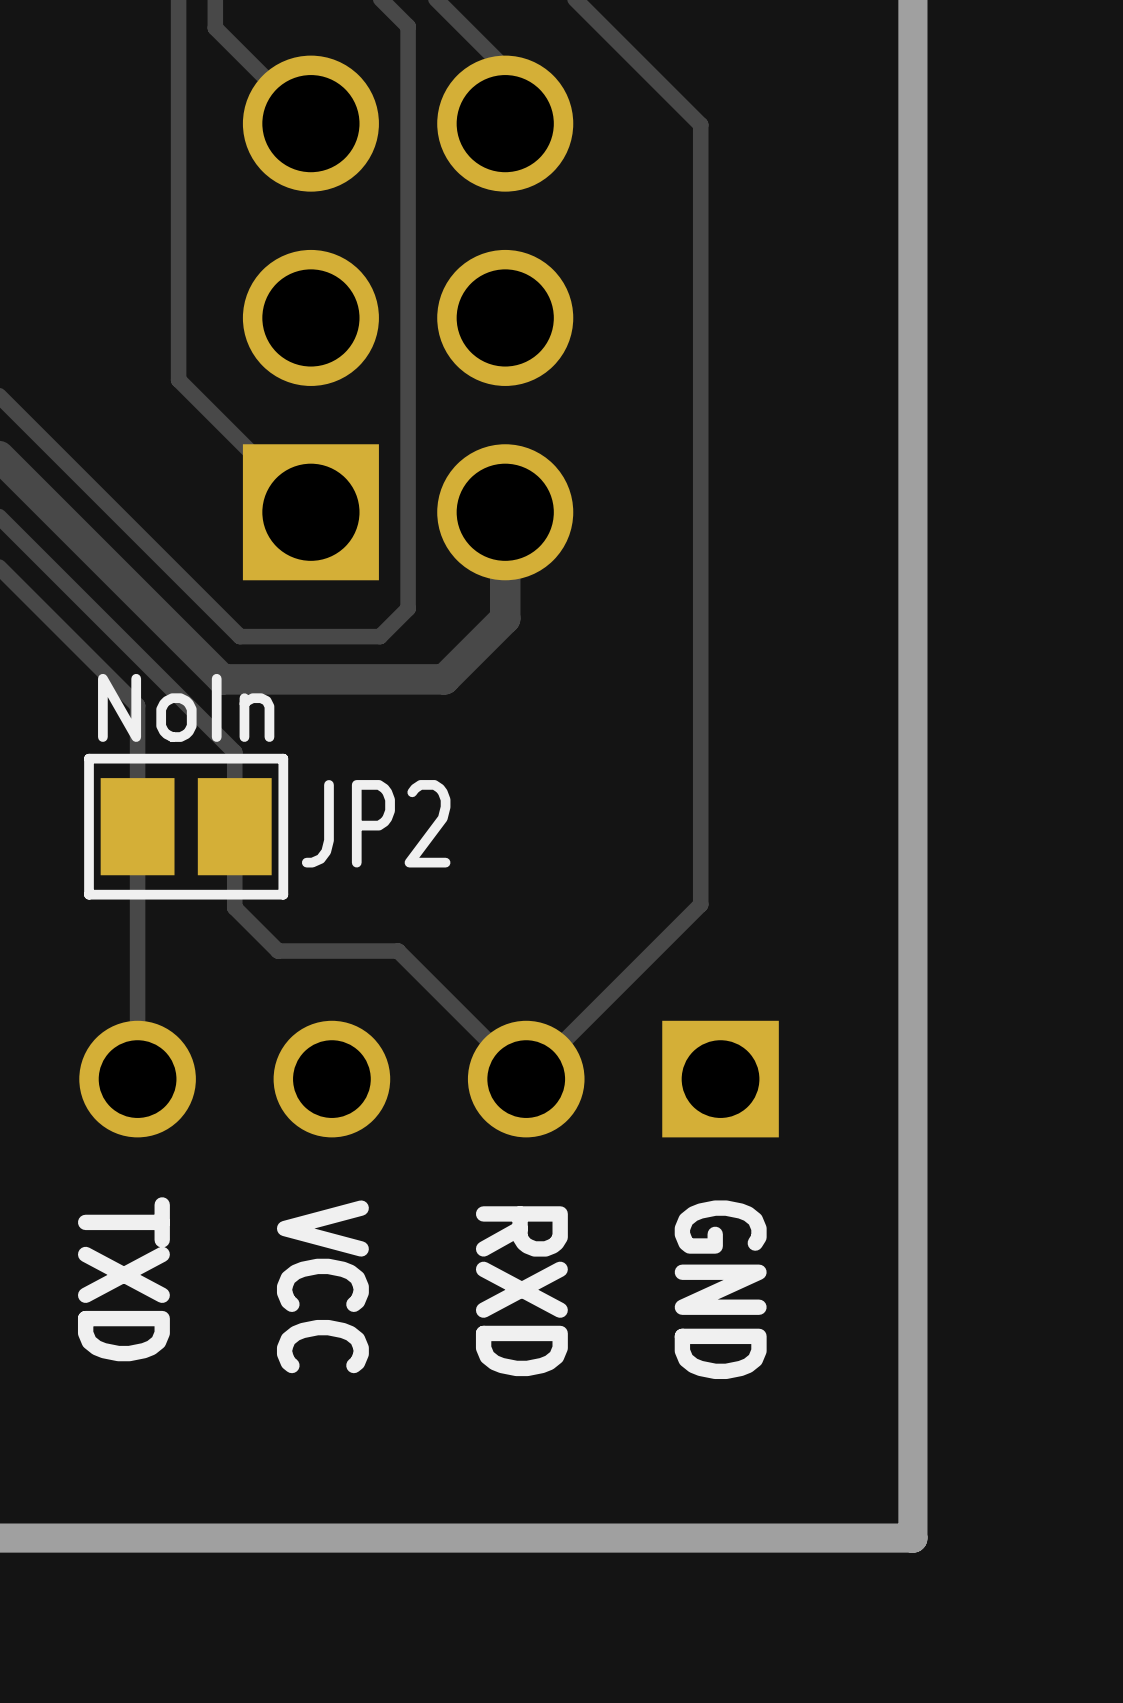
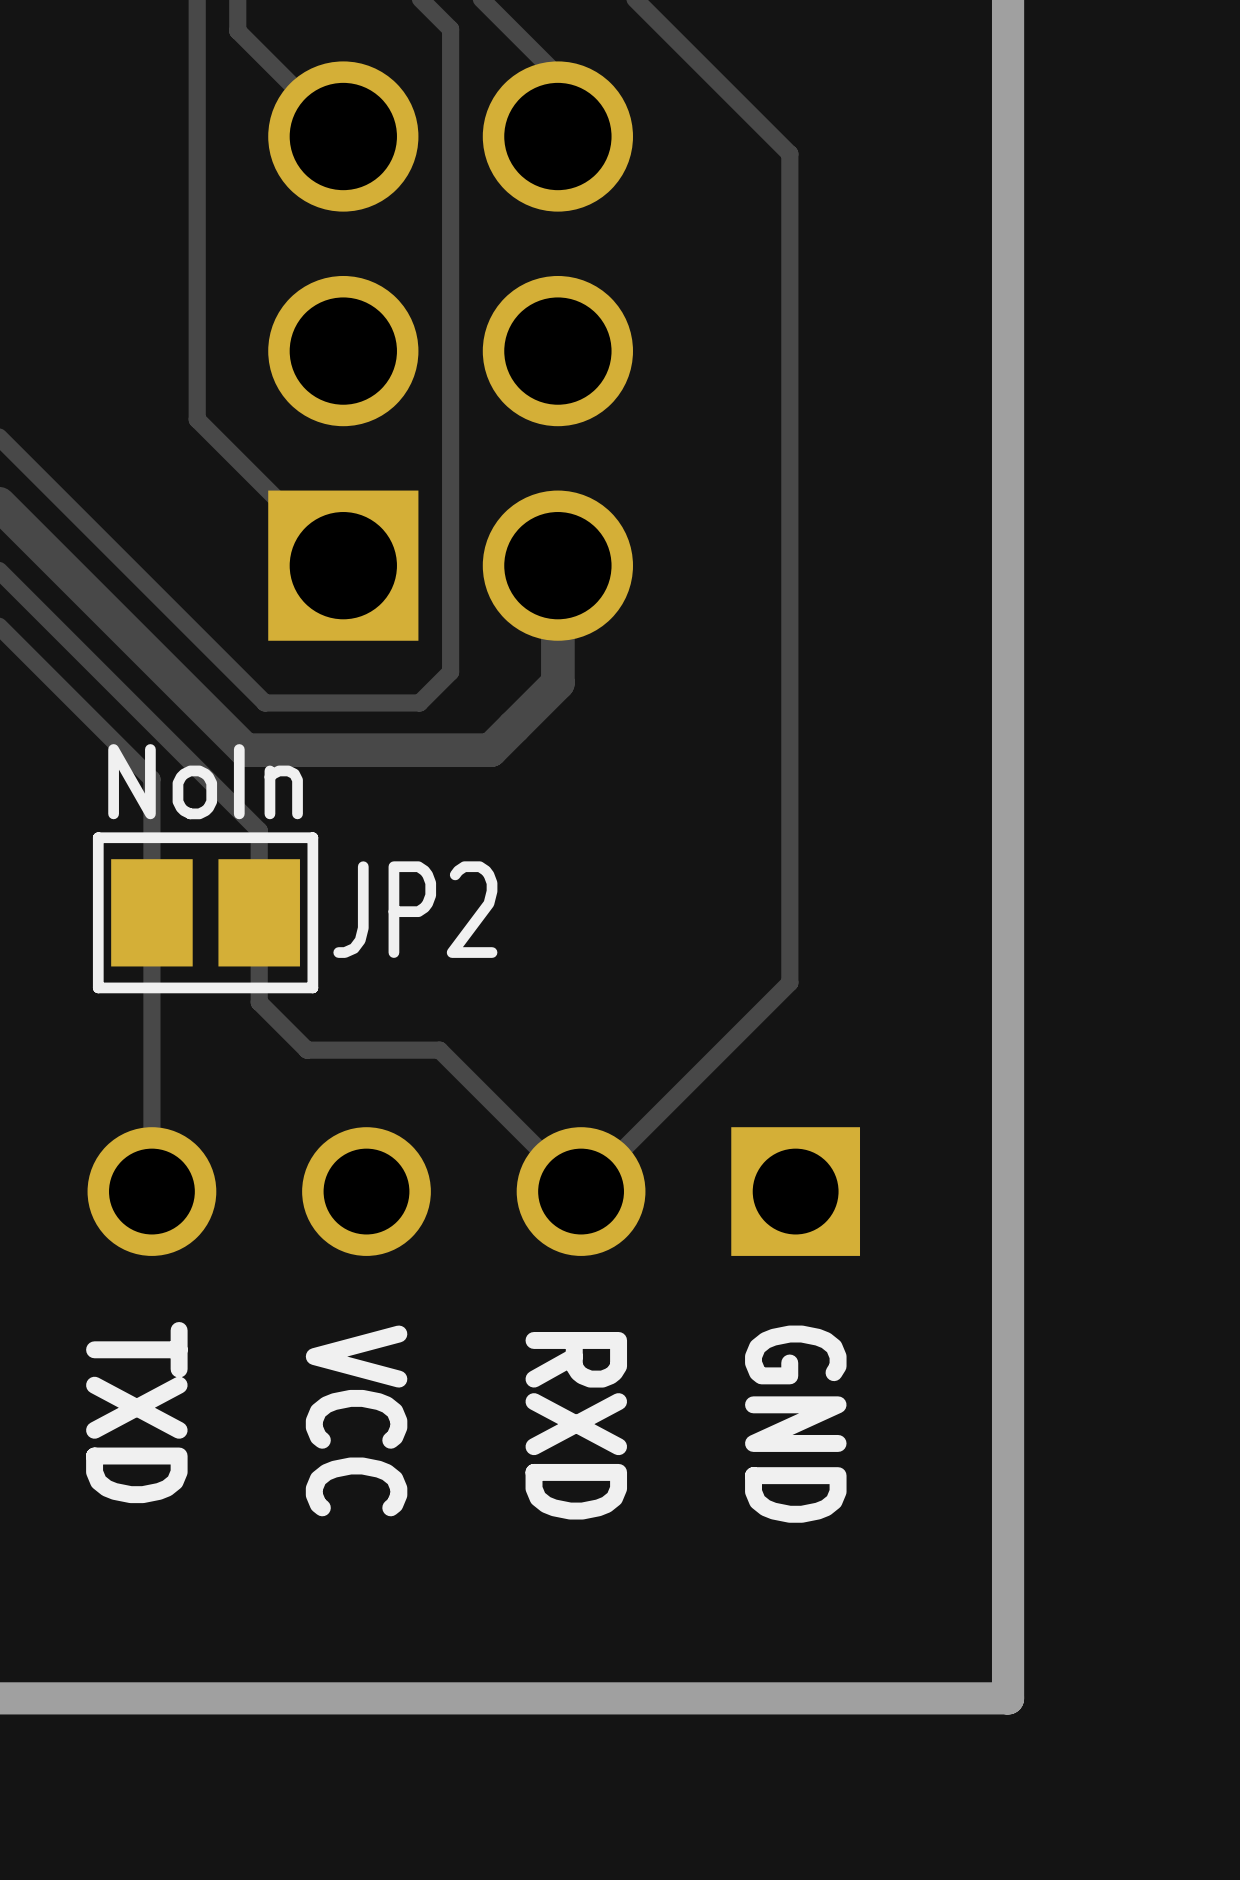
track: (700, 124) (700, 904) -> (773, 137) (789, 153) (789, 982) (773, 998)

